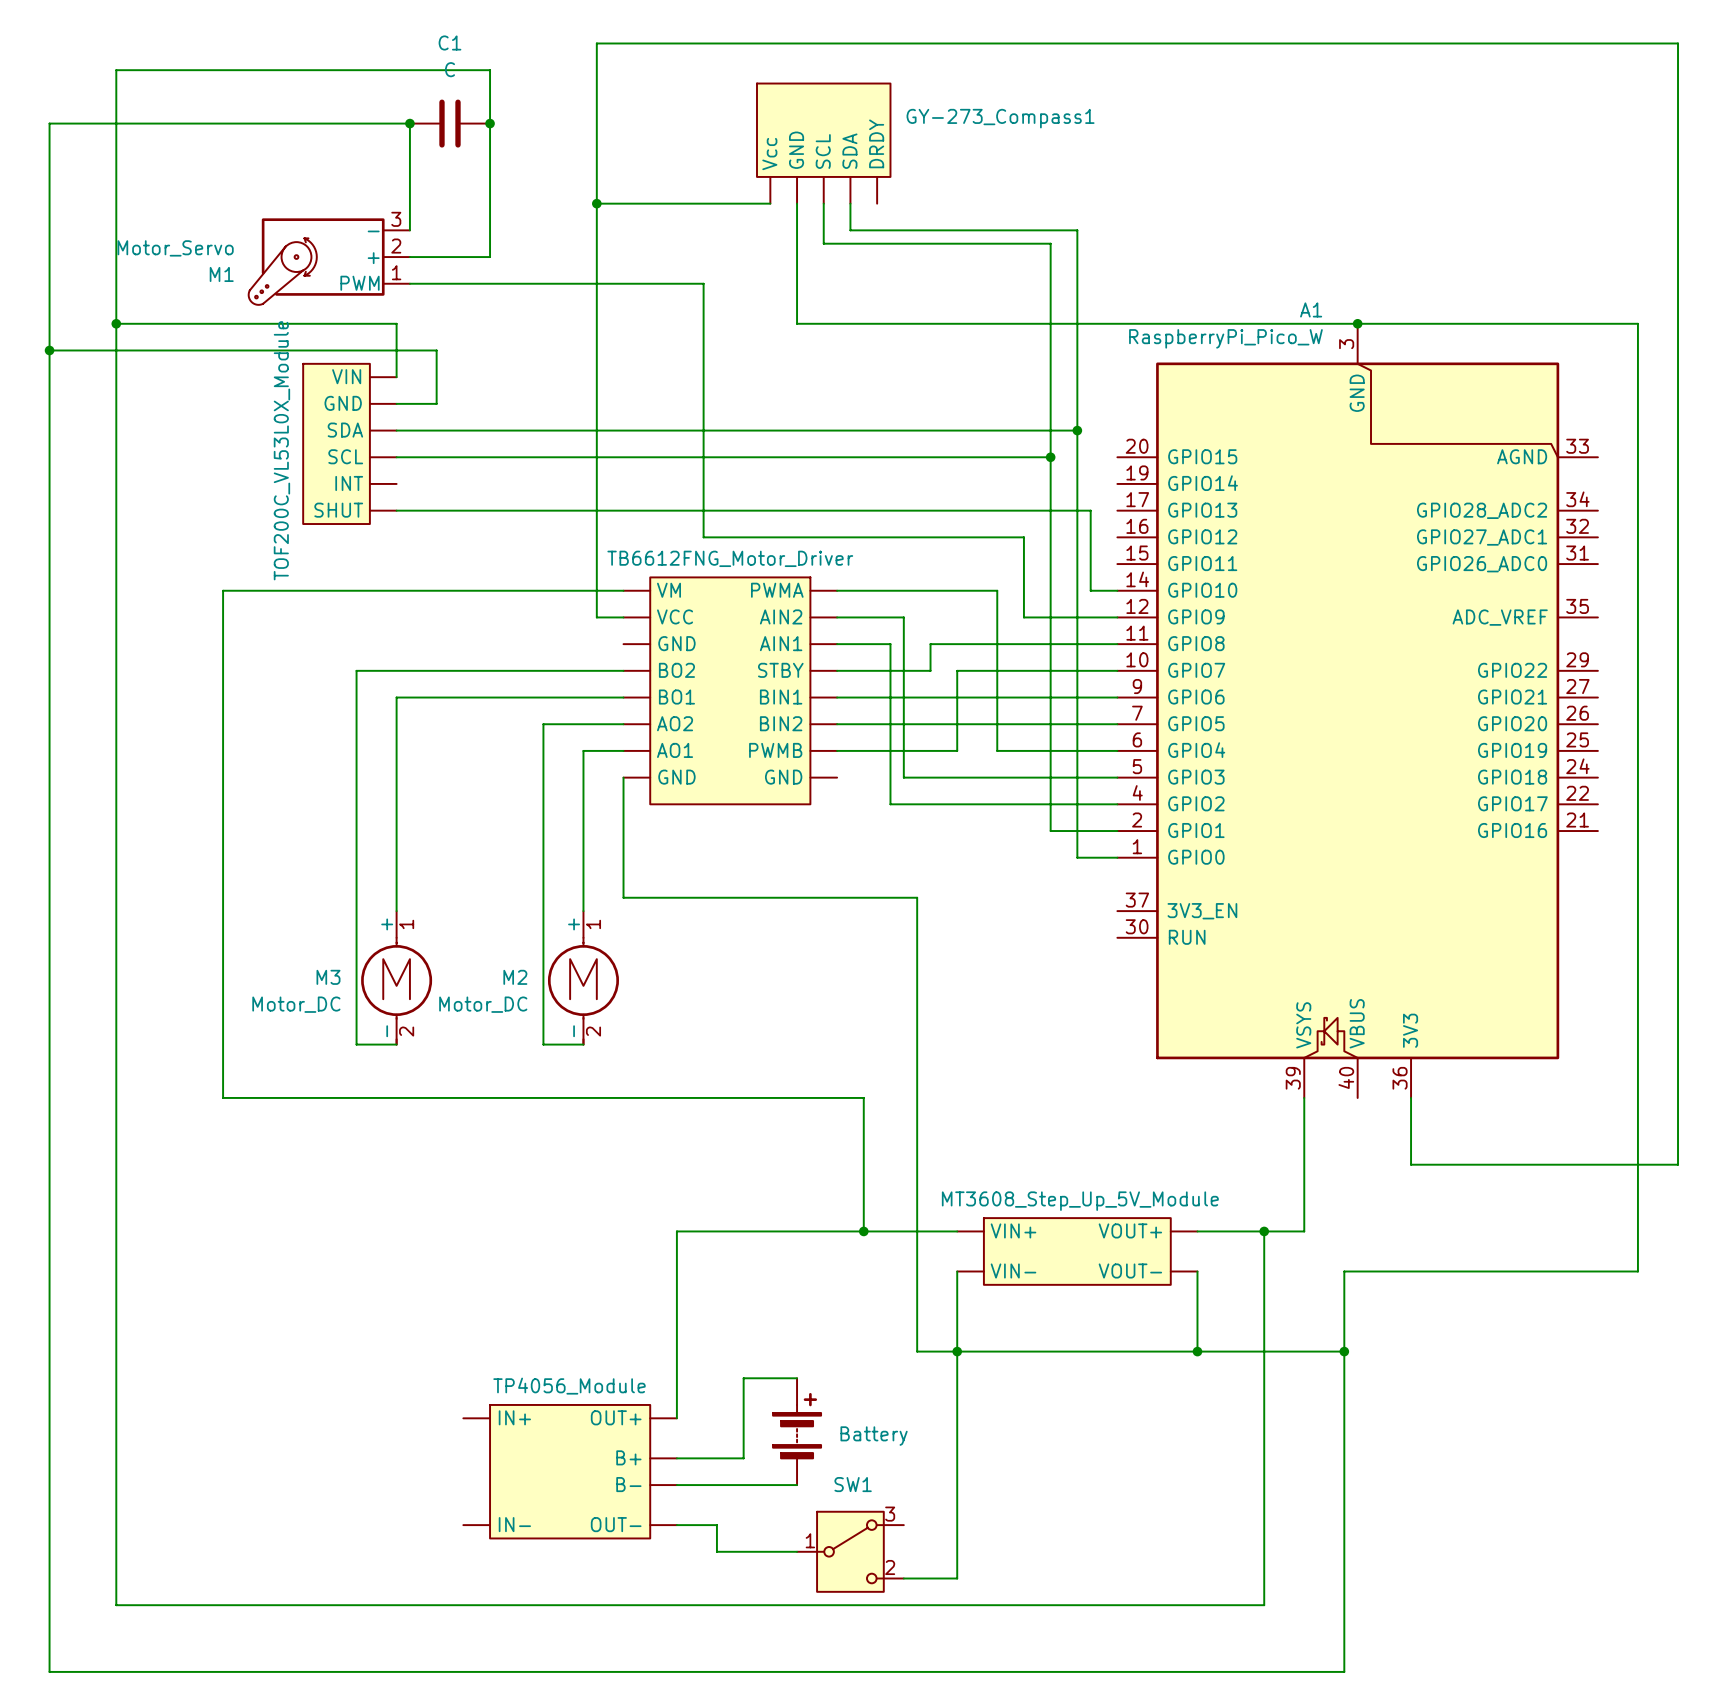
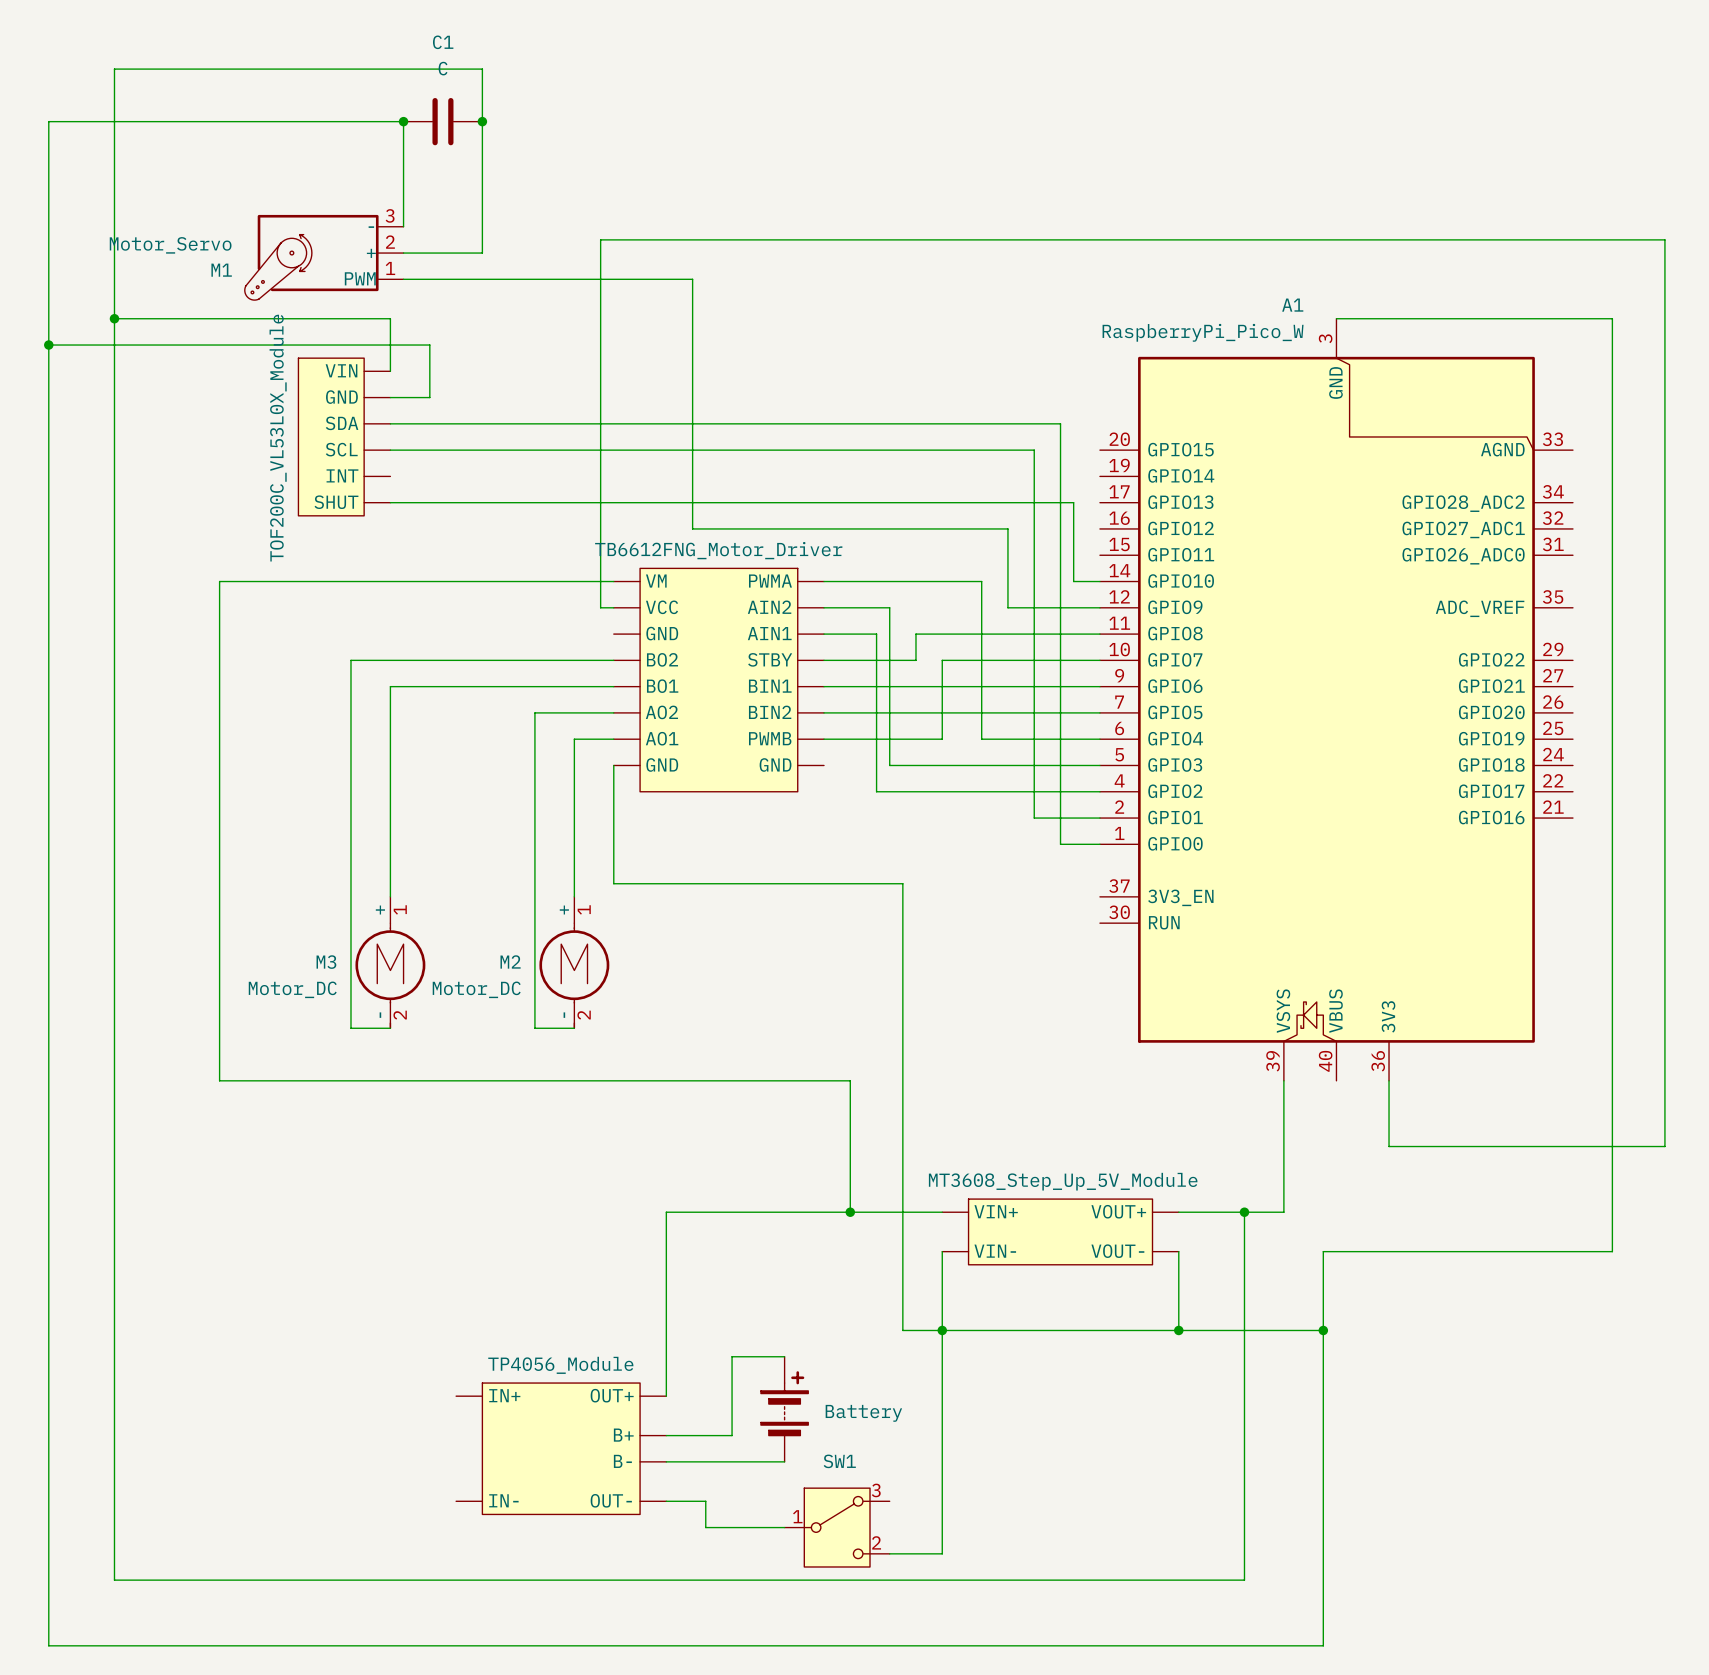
GY-273_Compass1: (823, 143) -> none
wire: (596, 203) (770, 203) -> none
junction: (596, 203) -> none
wire: (797, 203) (797, 323) (1357, 323) -> none
wire: (823, 203) (823, 243) -> (600, 607) (600, 239) (810, 239)
wire: (850, 203) (850, 230) (1077, 230) (1077, 430) -> none
wire: (1050, 243) (1050, 457) -> none
junction: (1357, 323) -> none
junction: (1077, 430) -> none
junction: (1050, 457) -> none
wire: (610, 617) (596, 617) (596, 43) (1678, 43) (1678, 1164) -> (1034, 239) (1664, 239) (1664, 1146) (1651, 1146)

